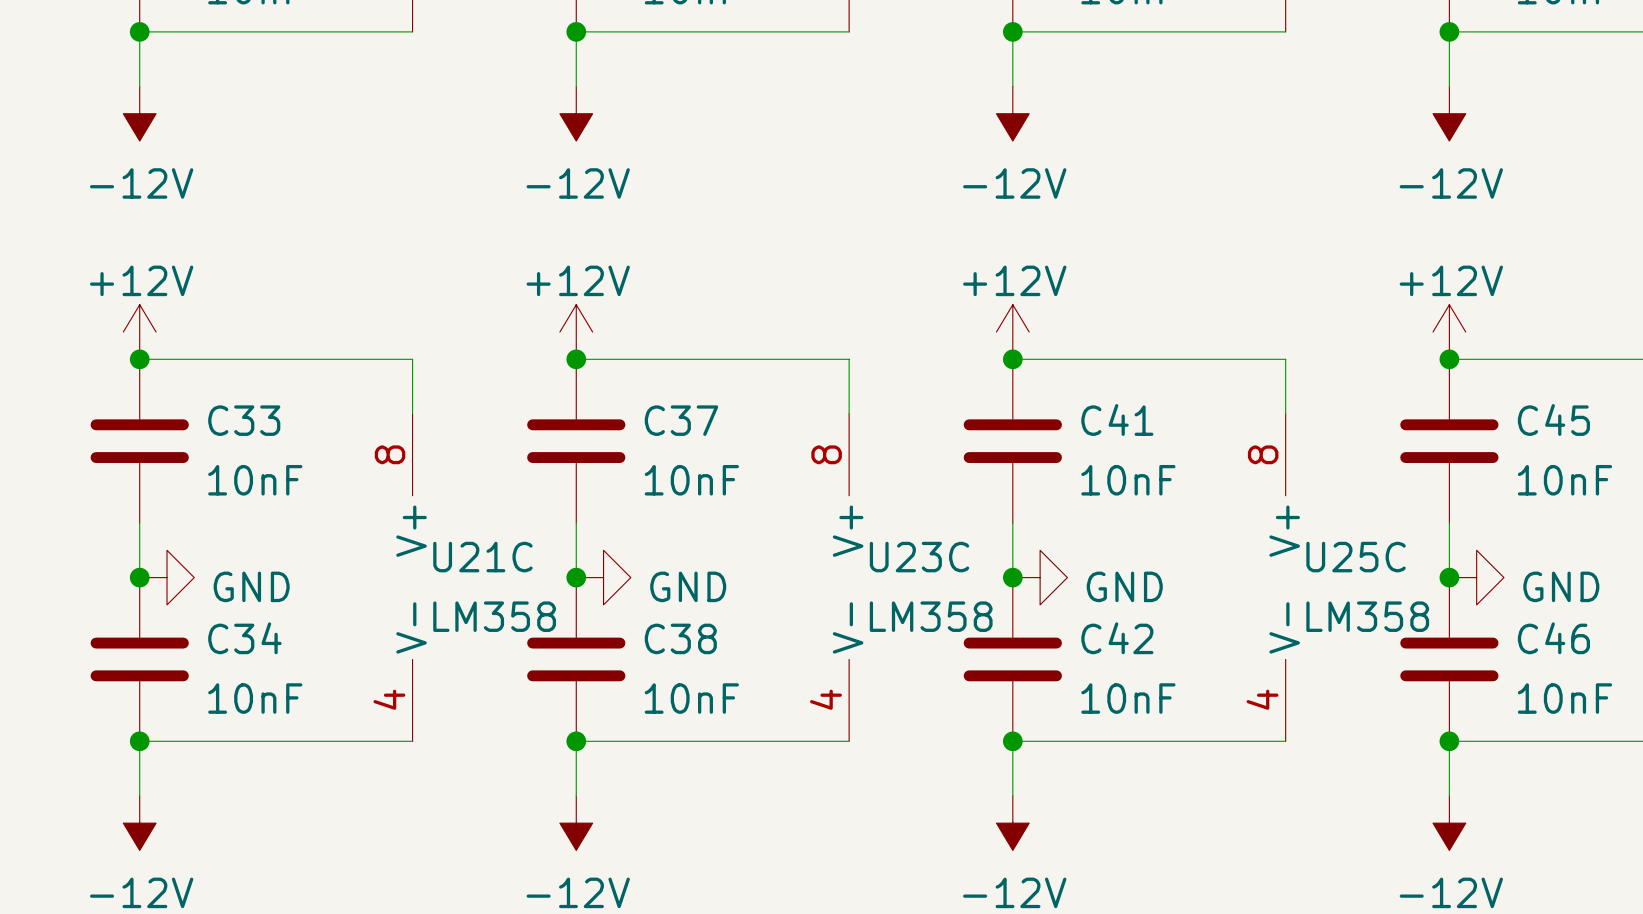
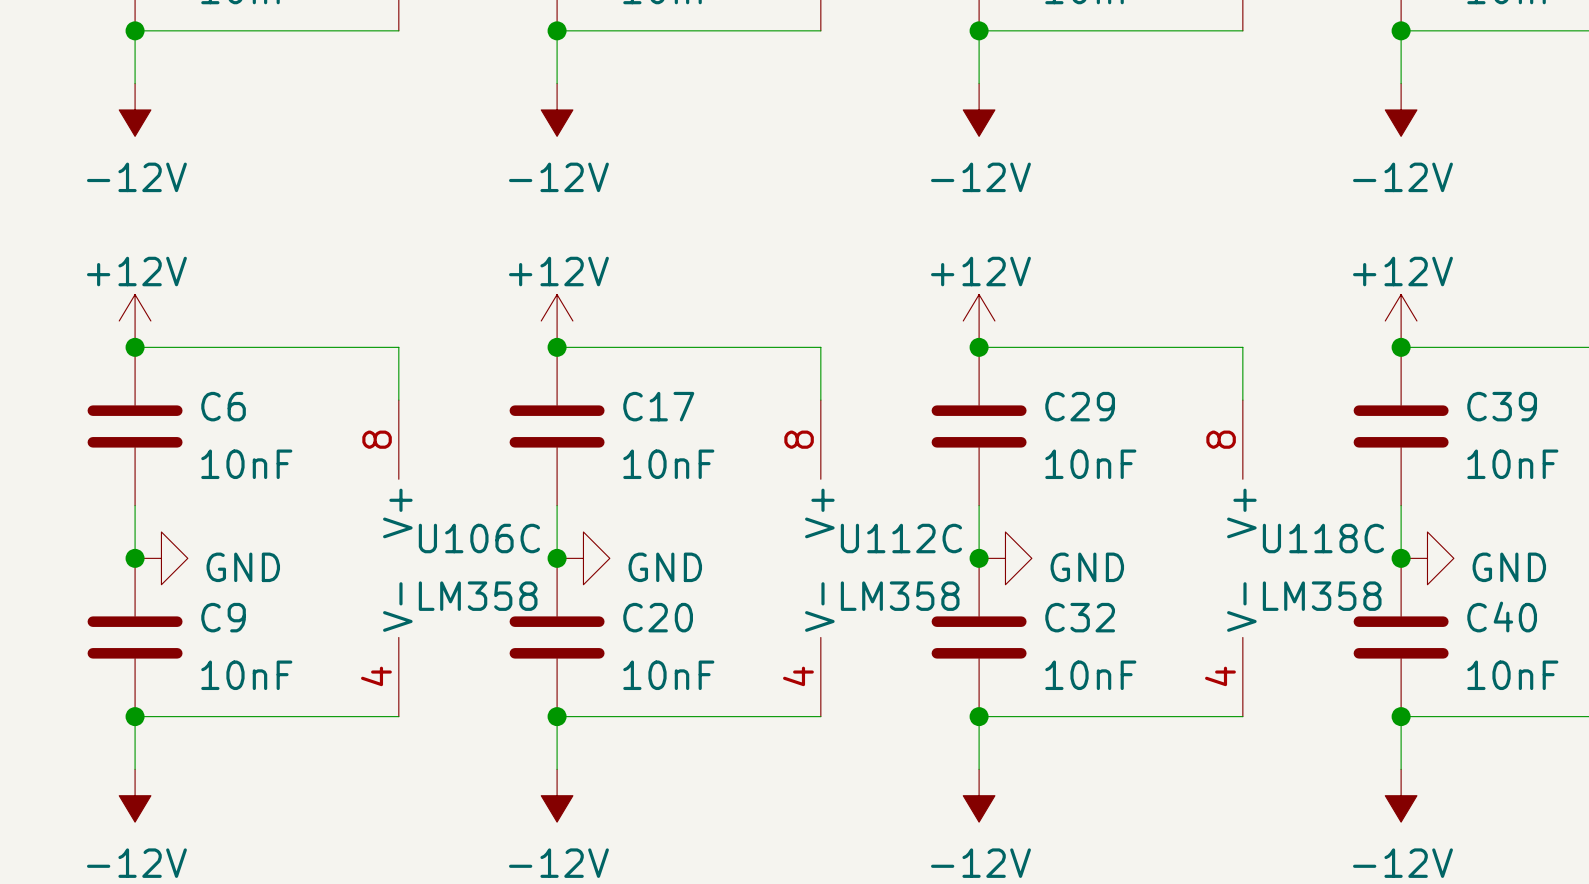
C41 name: C41 (1117, 419) -> C29 (1080, 406)
C45 name: C45 (1553, 419) -> C39 (1502, 406)
C33 name: C33 (244, 420) -> C6 (223, 406)
C37 name: C37 (681, 420) -> C17 (658, 406)
U21C name: U21C (482, 557) -> U106C (479, 538)
U23C name: U23C (919, 557) -> U112C (901, 538)
U25C name: U25C (1356, 557) -> U118C (1323, 538)
C34 name: C34 (244, 638) -> C9 (223, 617)
C38 name: C38 (680, 638) -> C20 (658, 617)
C42 name: C42 (1117, 638) -> C32 (1080, 617)
C46 name: C46 (1553, 638) -> C40 (1502, 617)

